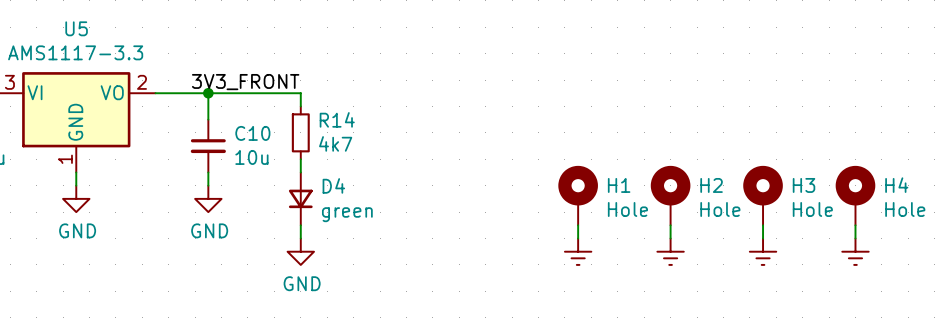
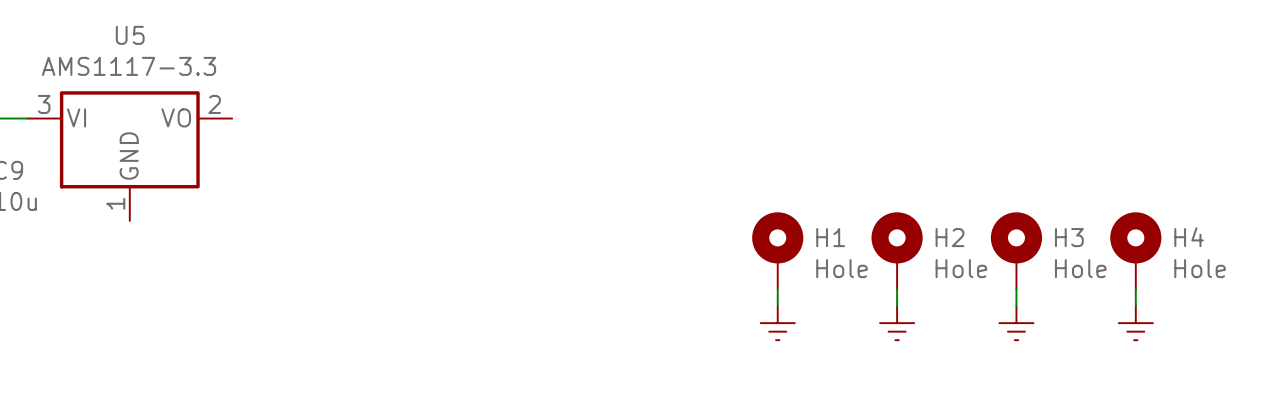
label: 3V3_FRONT (245, 82) -> none
wire: (155, 93) (300, 93) (300, 106) -> none
wire: (208, 93) (208, 119) -> none
junction: (208, 93) -> none
R14: 4k7 (300, 132) -> none
C10: 10u (208, 146) -> none
wire: (300, 159) (300, 172) -> none
wire: (76, 172) (76, 185) -> none
wire: (208, 172) (208, 185) -> none
power symbol: GND (76, 198) -> none
power symbol: GND (208, 198) -> none
D4: green (300, 198) -> none
wire: (300, 225) (300, 238) -> none
power symbol: GND (300, 251) -> none

